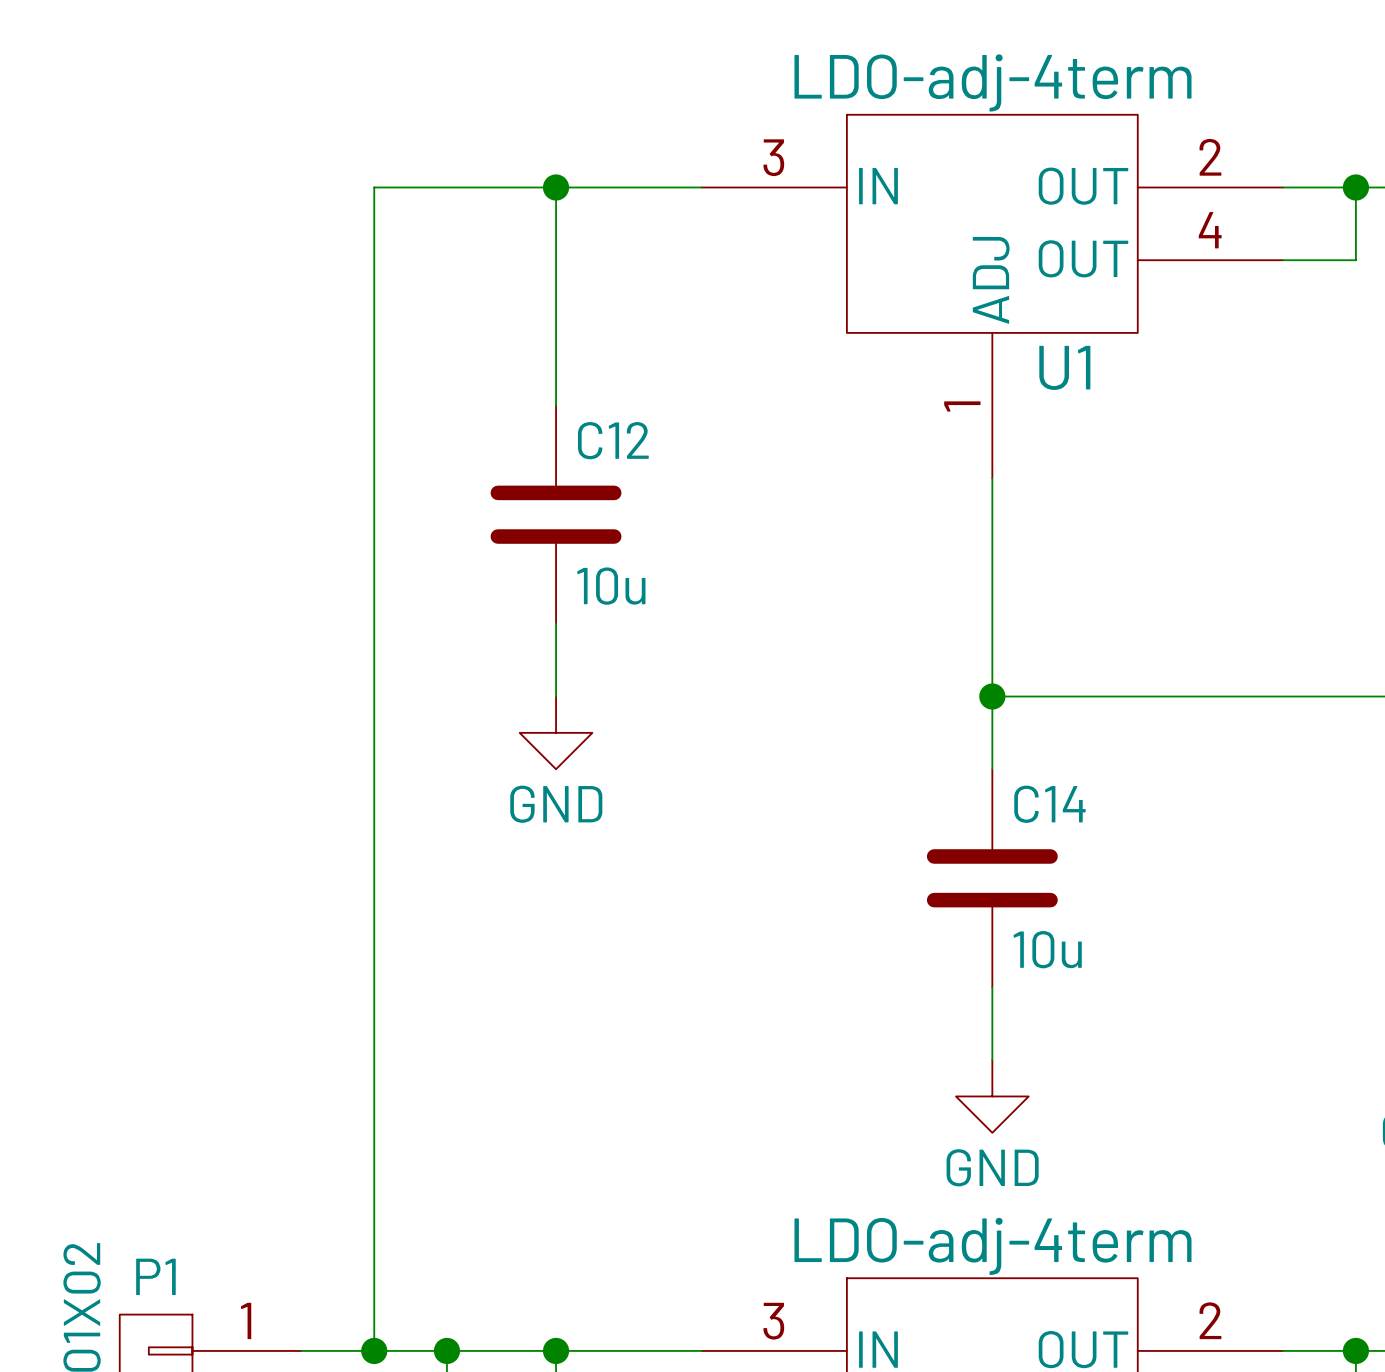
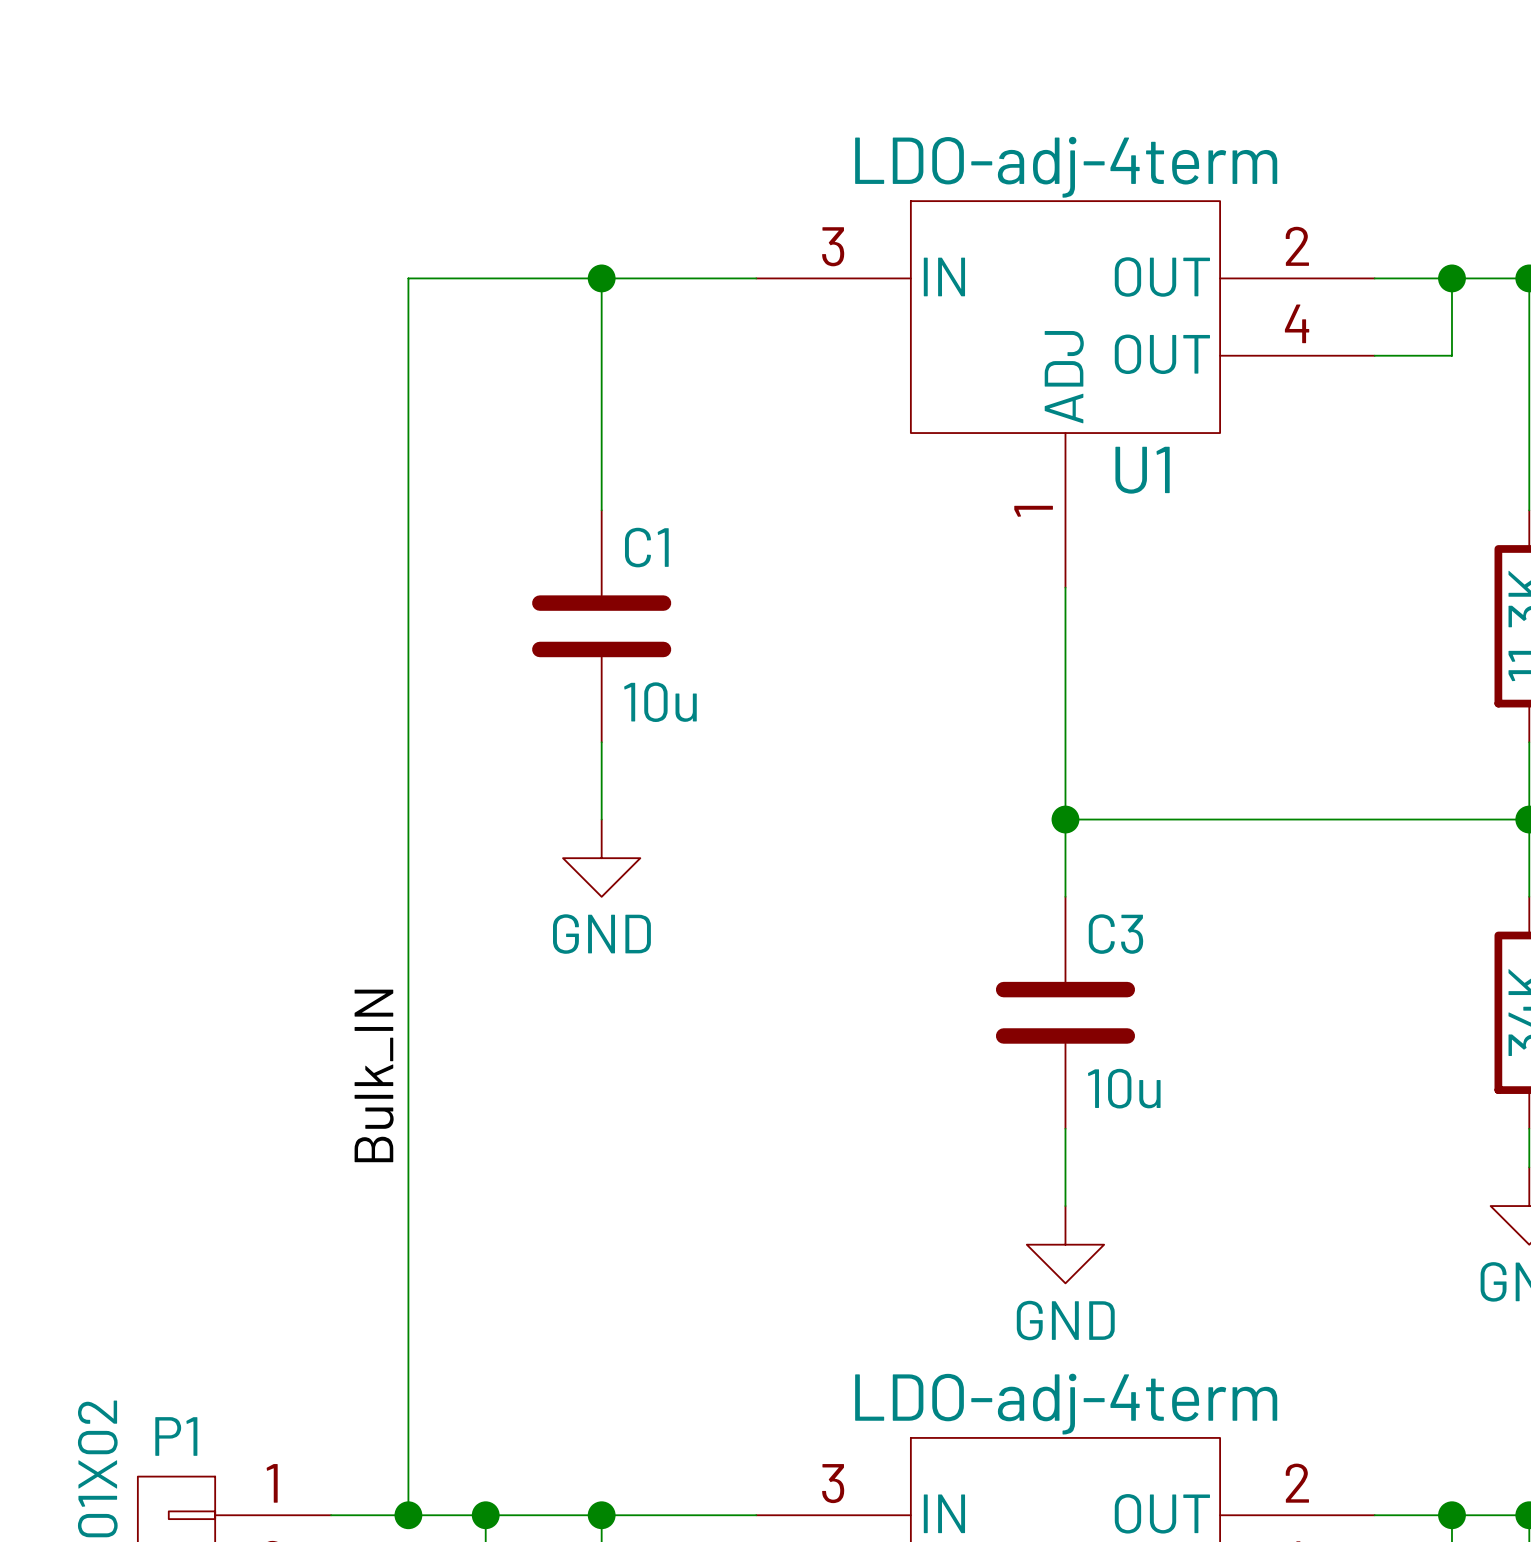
C12 name: C12 (613, 440) -> C1 (646, 547)
C14 name: C14 (1049, 804) -> C3 (1115, 934)
label: none -> Bulk_IN (374, 1075)

